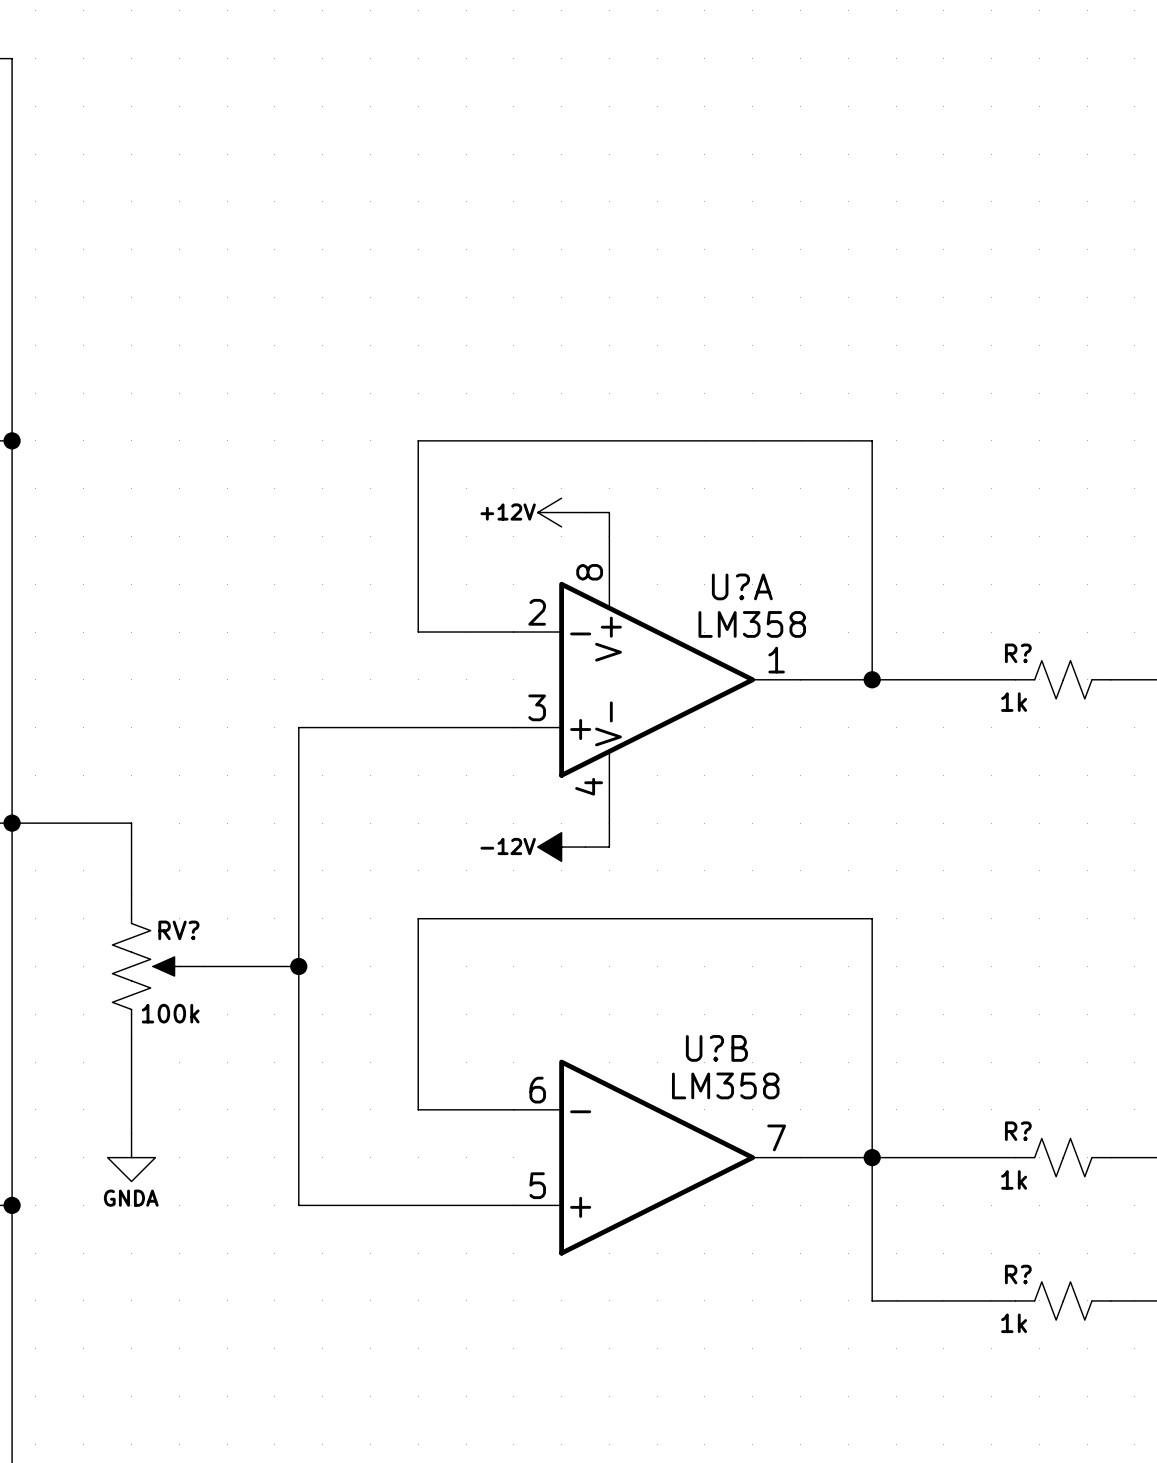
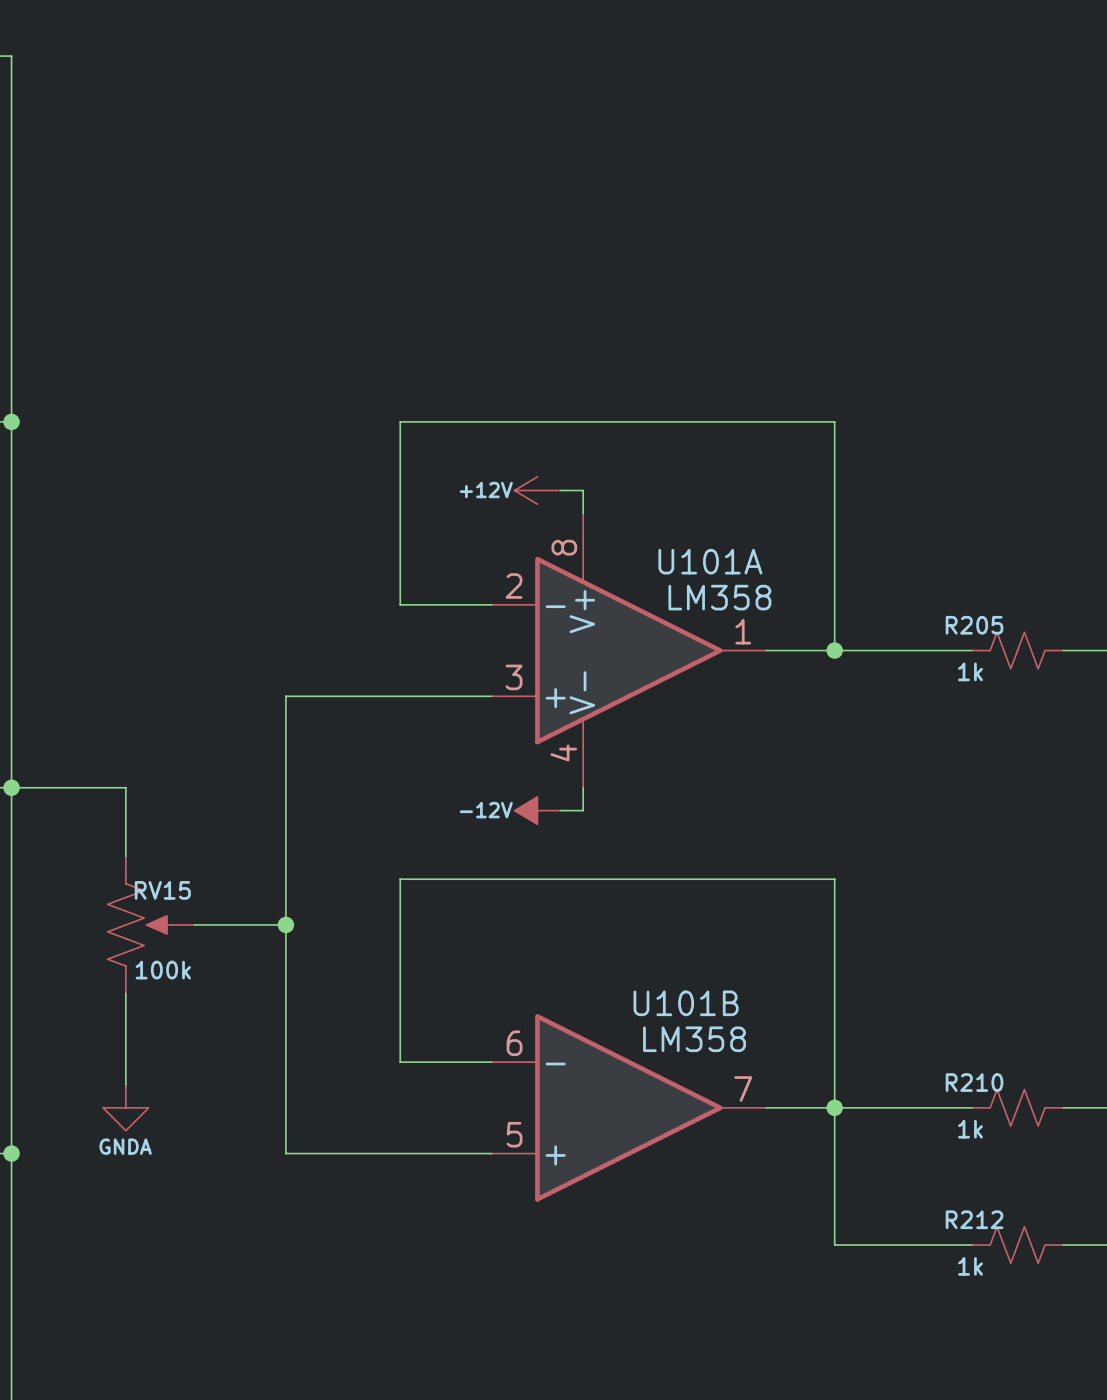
U?A name: U?A (742, 586) -> U101A (710, 561)
R? name: R? (1018, 653) -> R205 (974, 625)
RV? name: RV? (178, 930) -> RV15 (162, 890)
U?B name: U?B (716, 1048) -> U101B (686, 1003)
R? name: R? (1018, 1131) -> R210 (974, 1082)
R? name: R? (1018, 1274) -> R212 (974, 1219)

